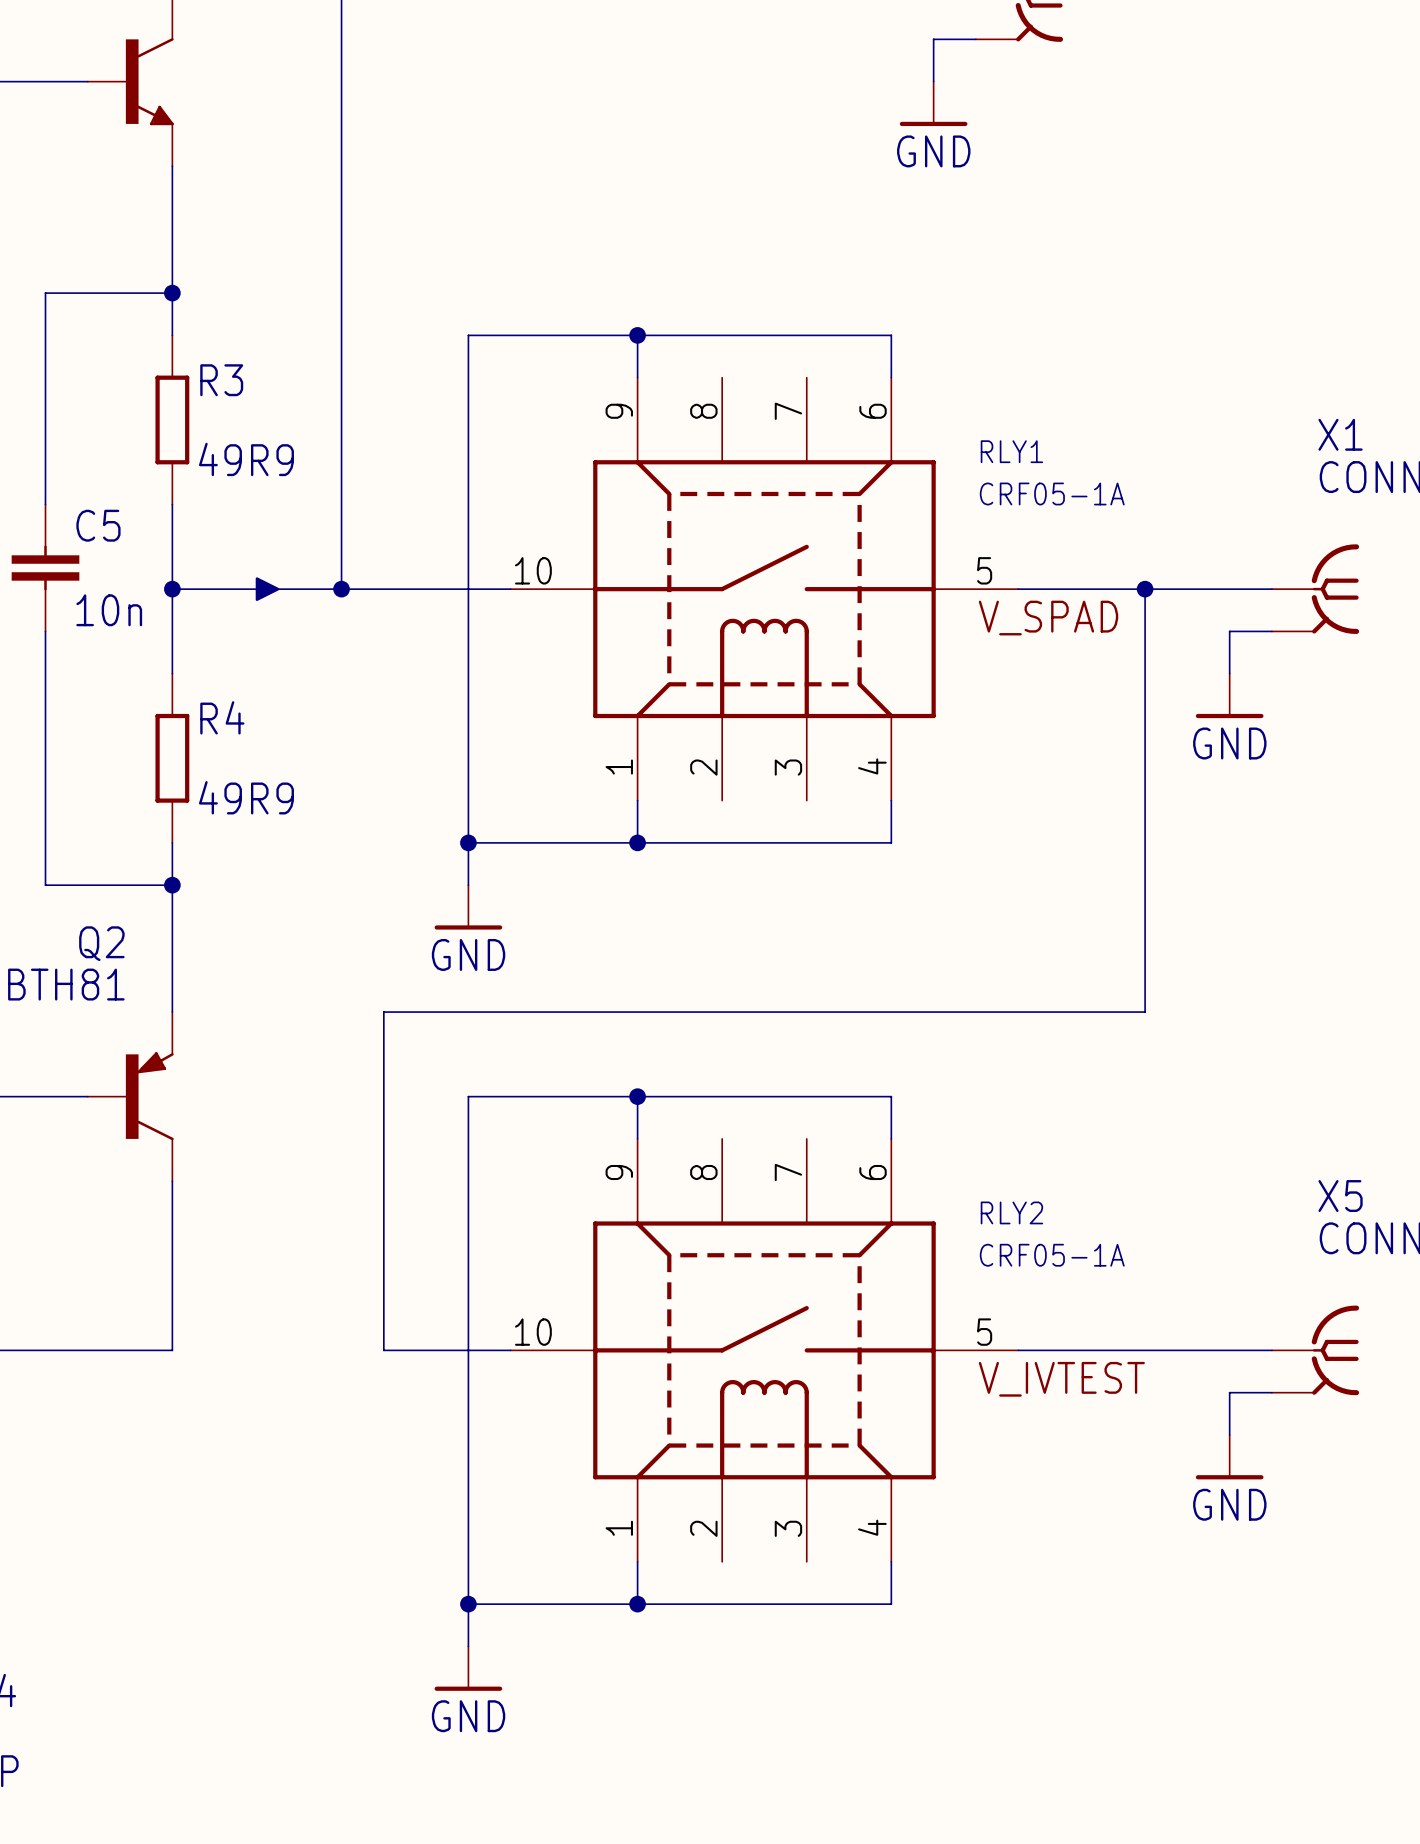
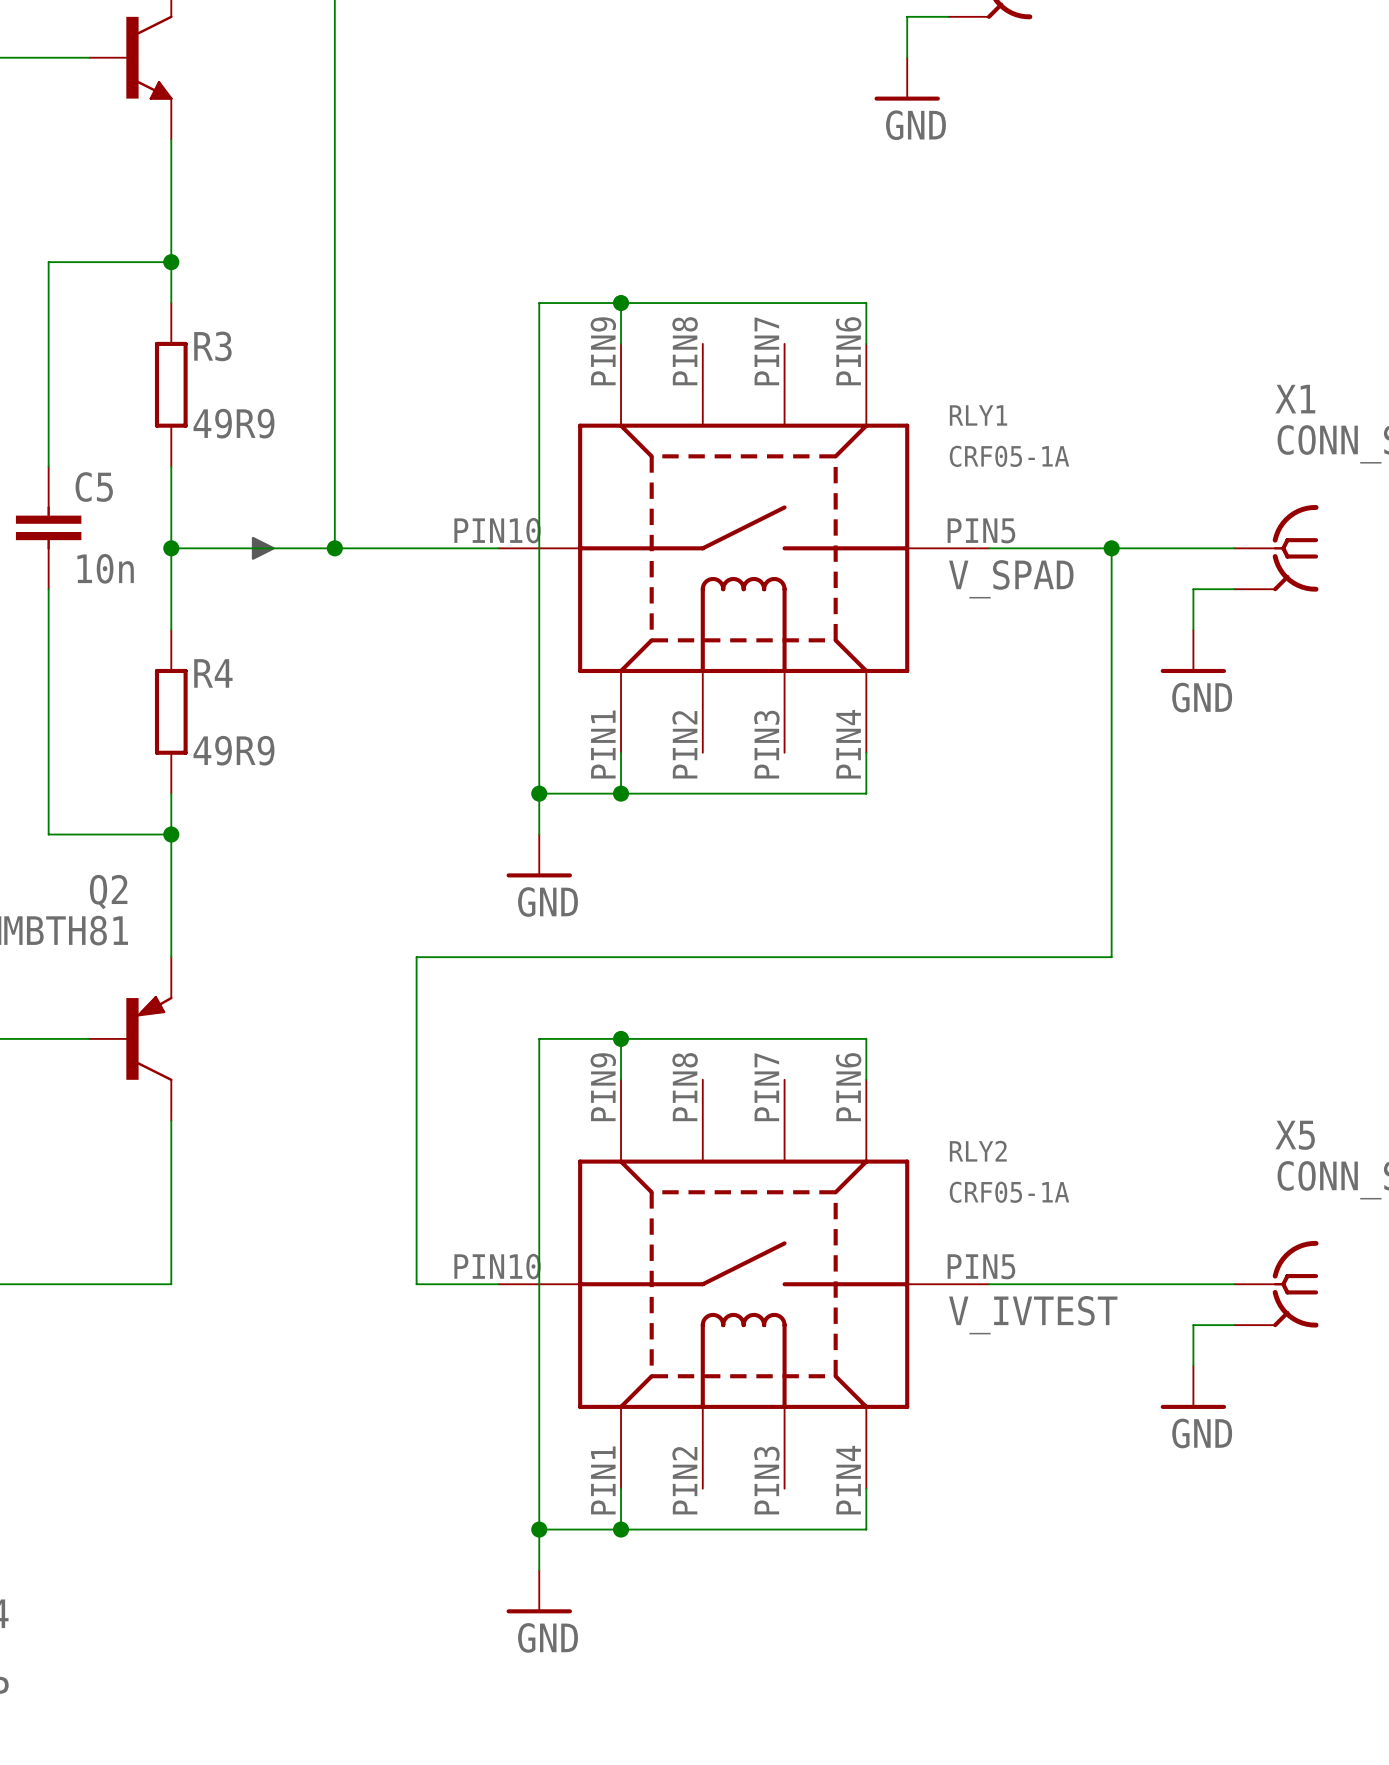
wire: (553, 335) (468, 335) (468, 885) -> (539, 303) (539, 834)
RLY1 symbol: [510, 377, 1019, 801] -> [498, 343, 989, 753]
wire: (468, 842) (553, 842) -> none
junction position: (468, 842) -> (539, 793)
power symbol position: GND (468, 907) -> GND (539, 855)
wire: (426, 1012) (383, 1012) (383, 1350) (426, 1350) -> (416, 957) (416, 1284)
wire: (553, 1096) (468, 1096) (468, 1646) -> (539, 1038) (539, 1570)
RLY2 symbol: [510, 1138, 1019, 1562] -> [498, 1079, 989, 1489]
wire: (468, 1604) (553, 1604) -> none
junction position: (468, 1604) -> (539, 1529)
power symbol position: GND (468, 1668) -> GND (539, 1591)

